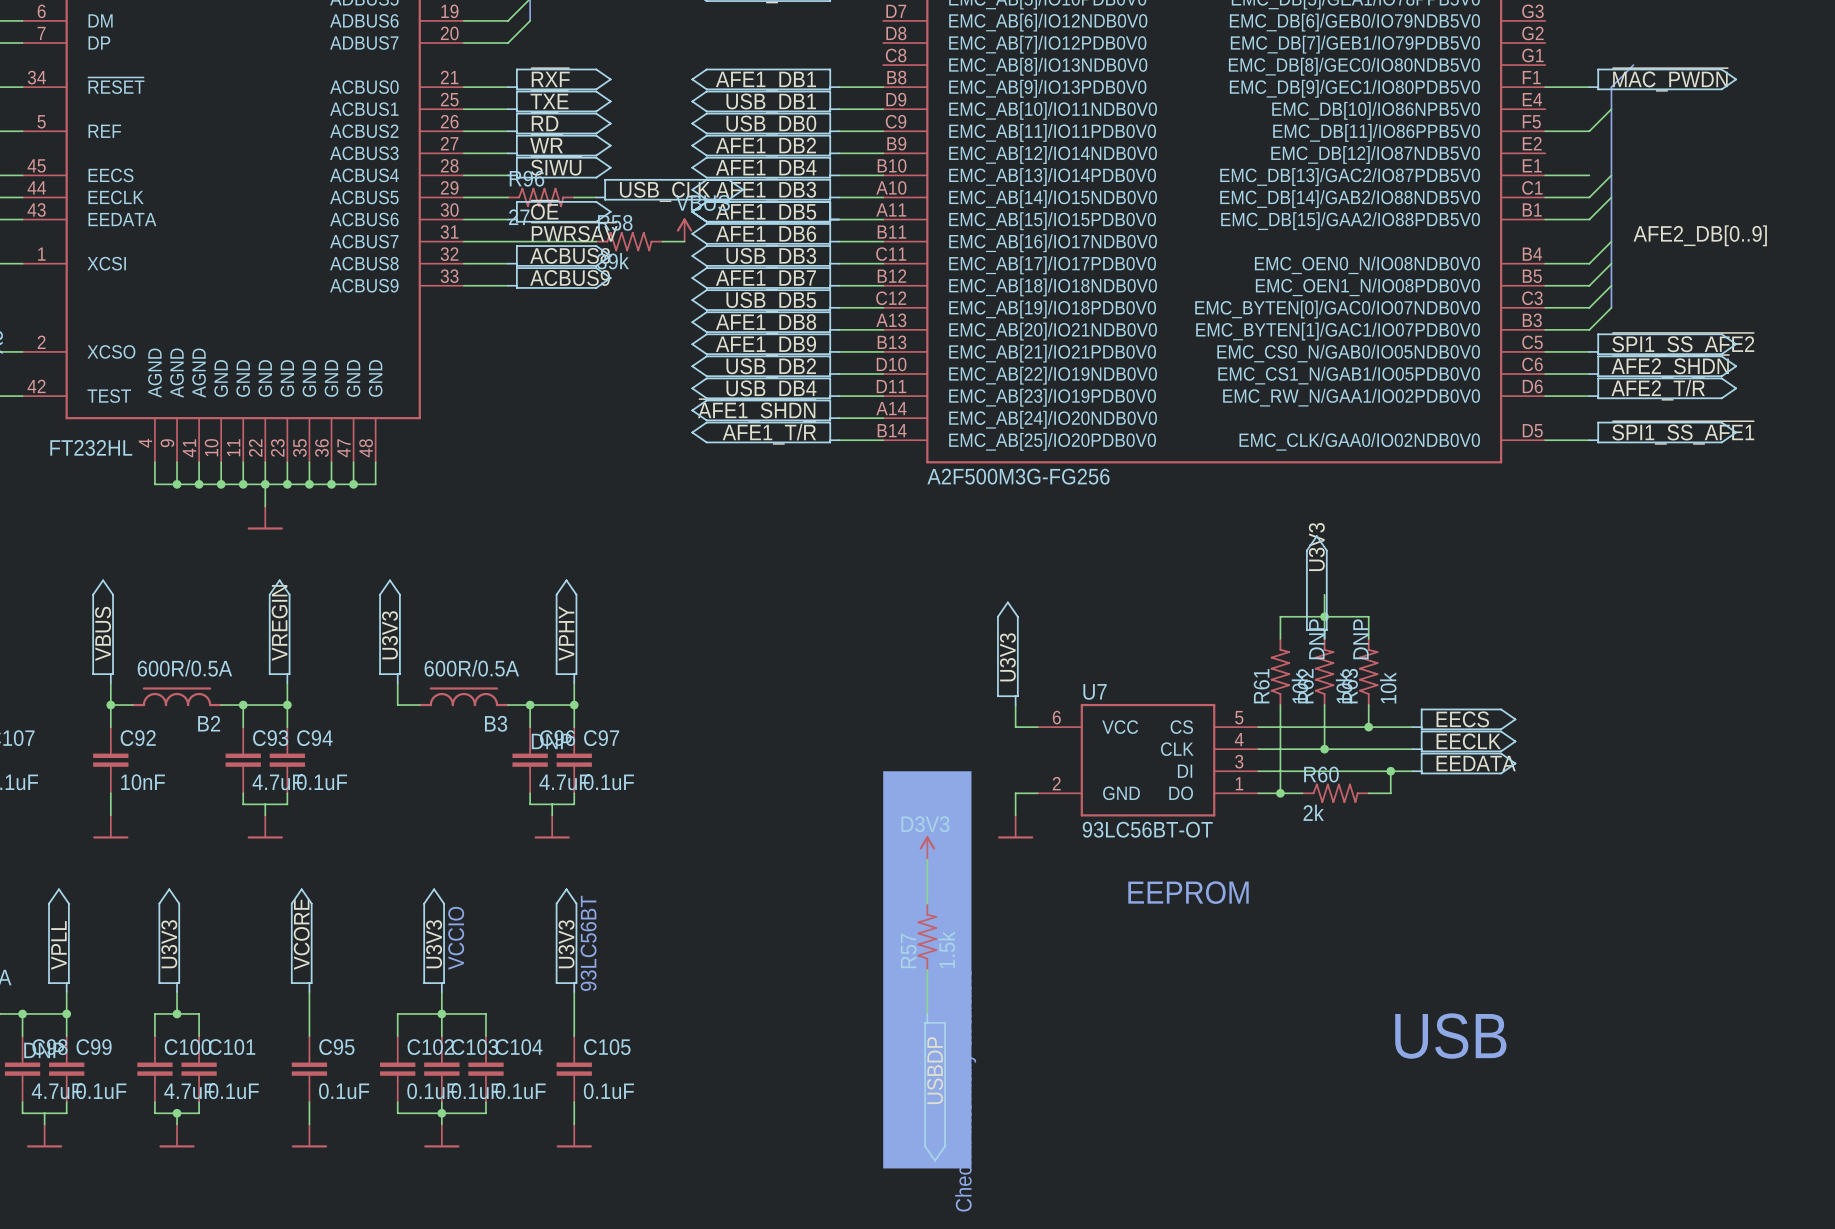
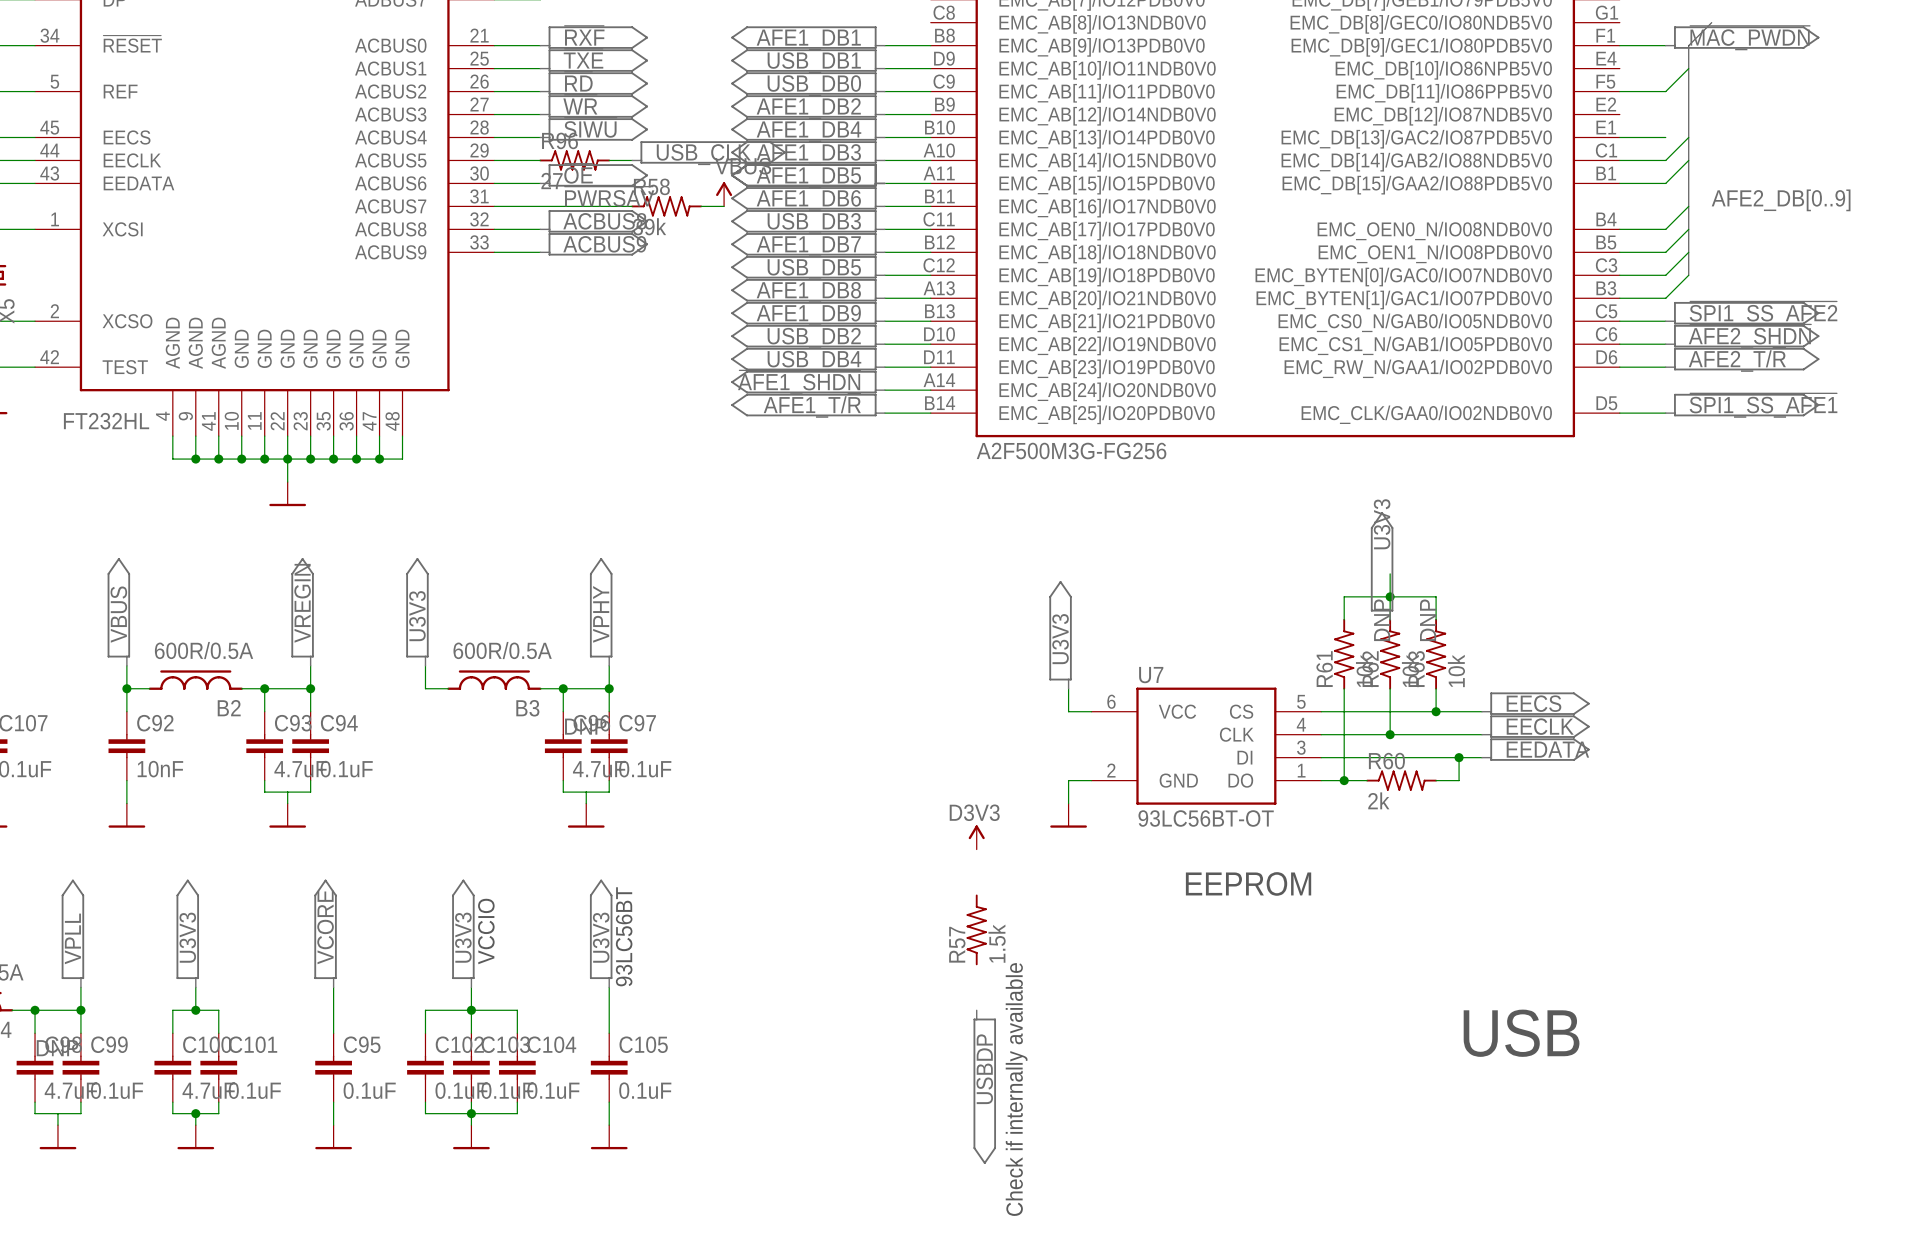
drawing: [883, 771, 972, 1169] -> none
wire: (927, 859) (927, 903) -> none
wire: (927, 969) (927, 1013) -> none

